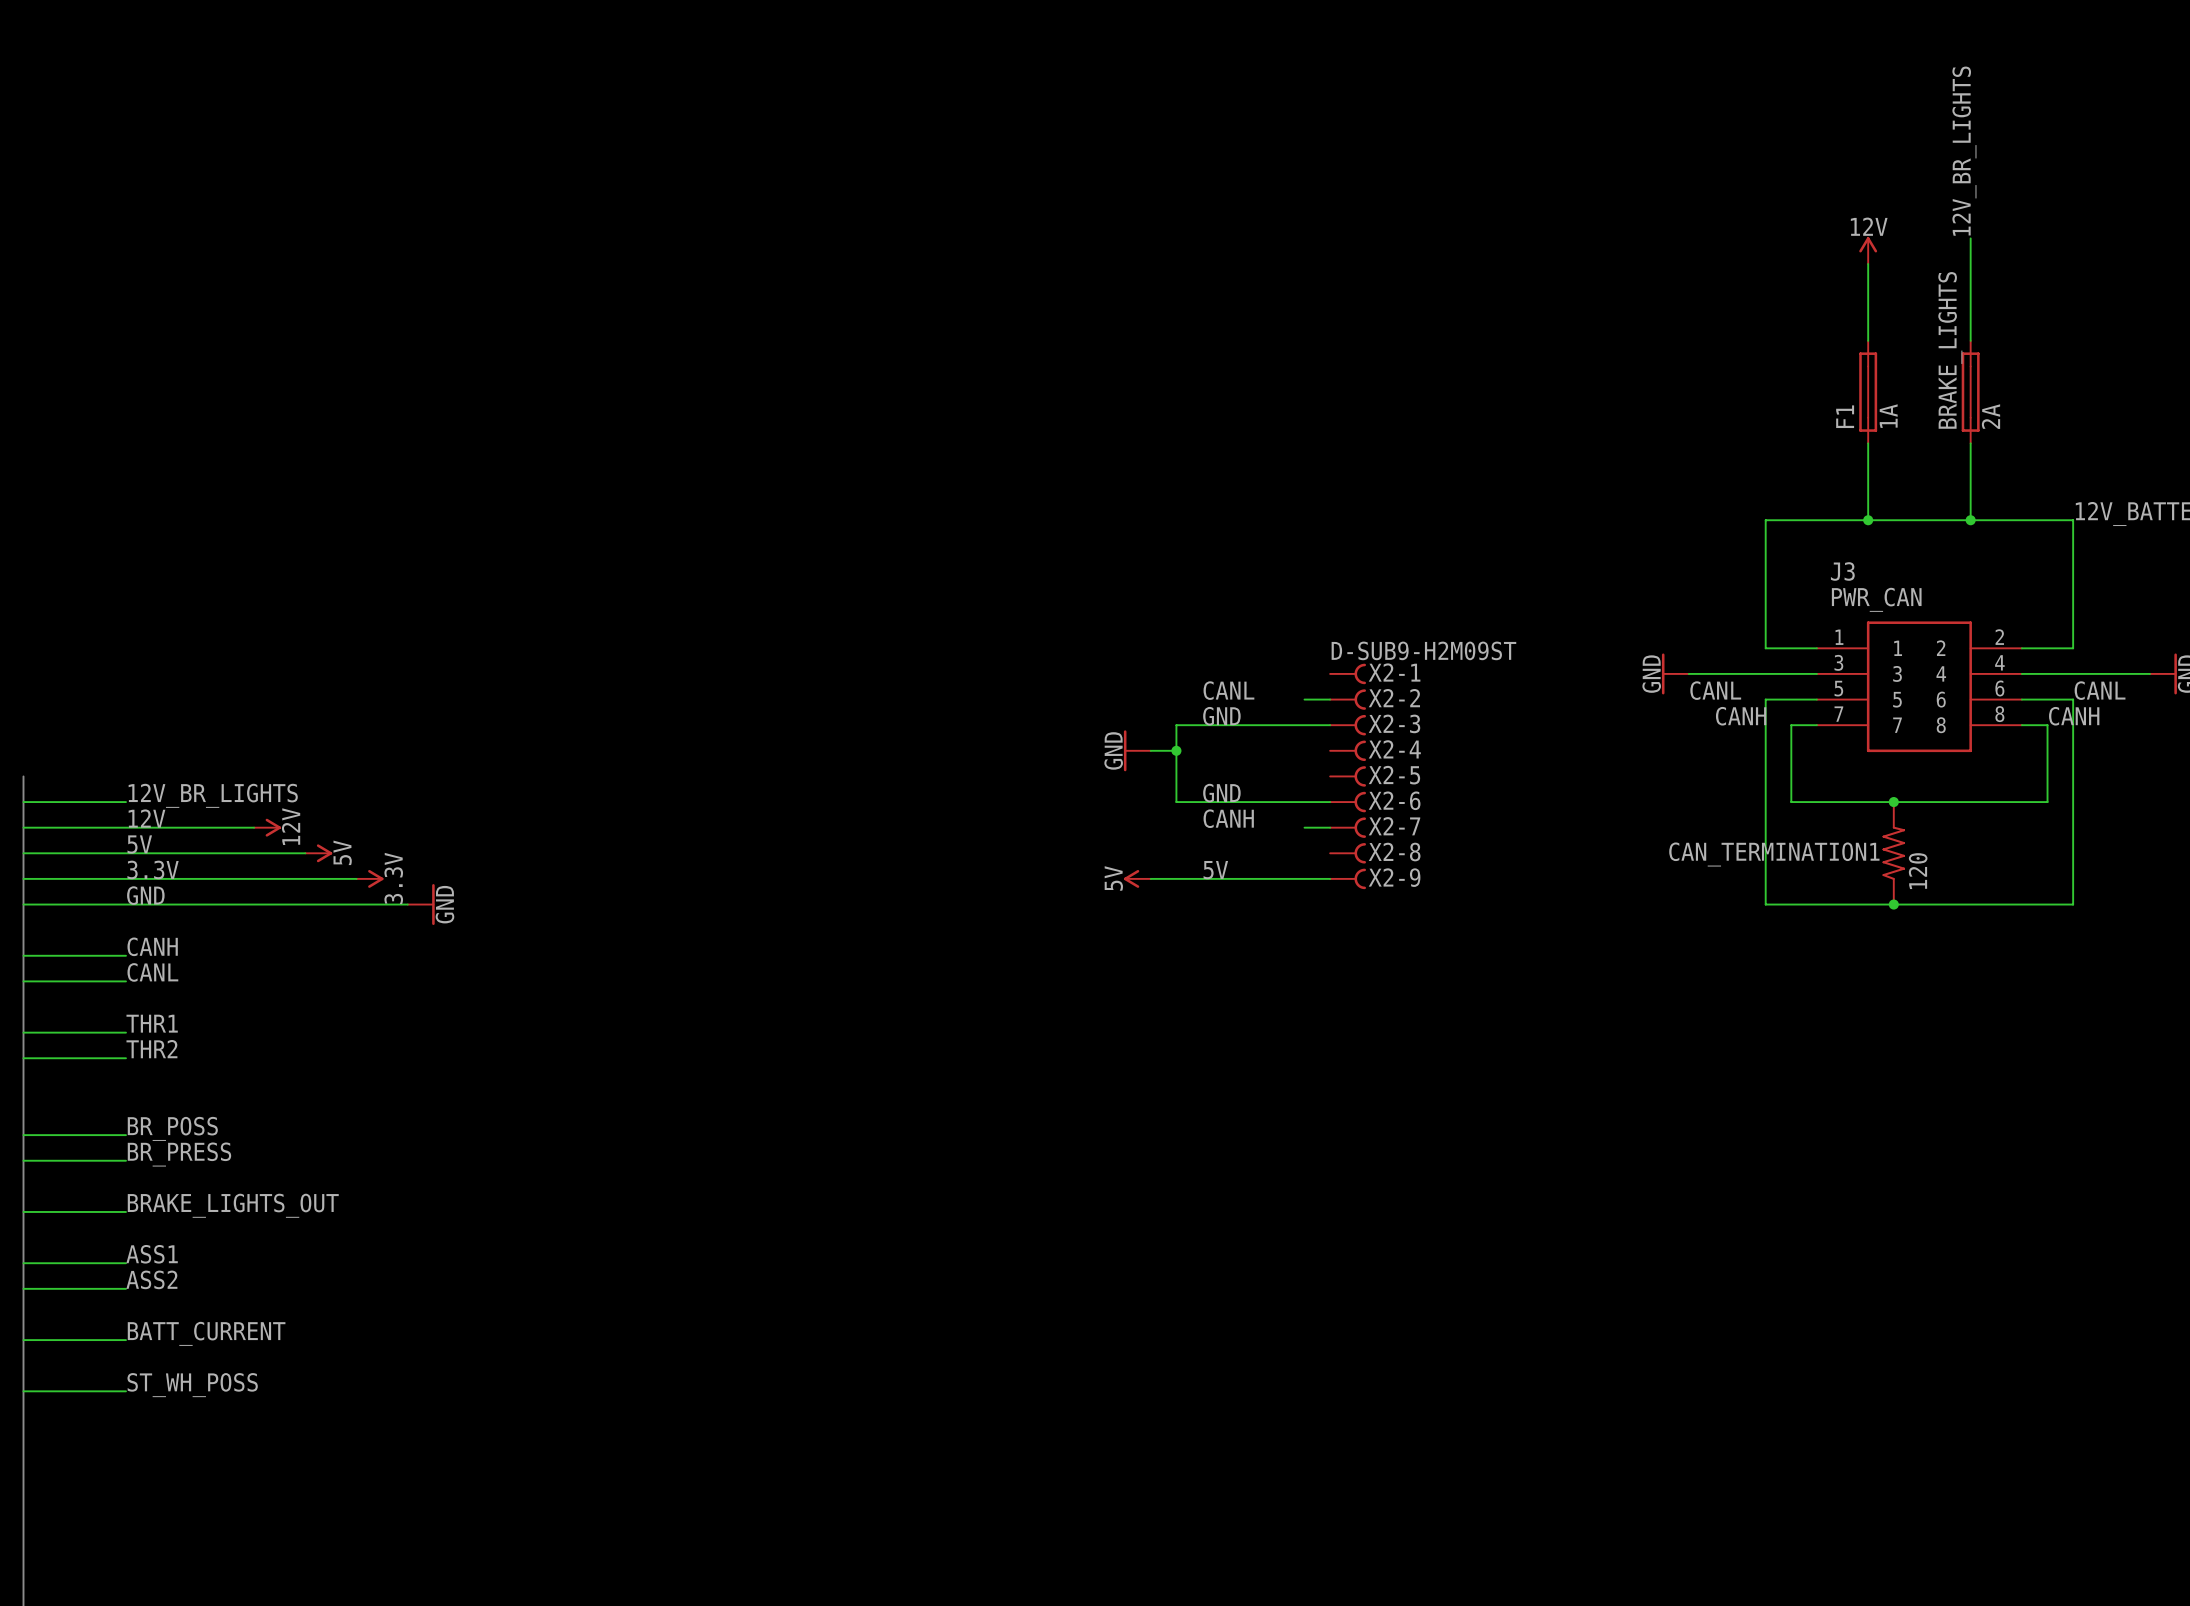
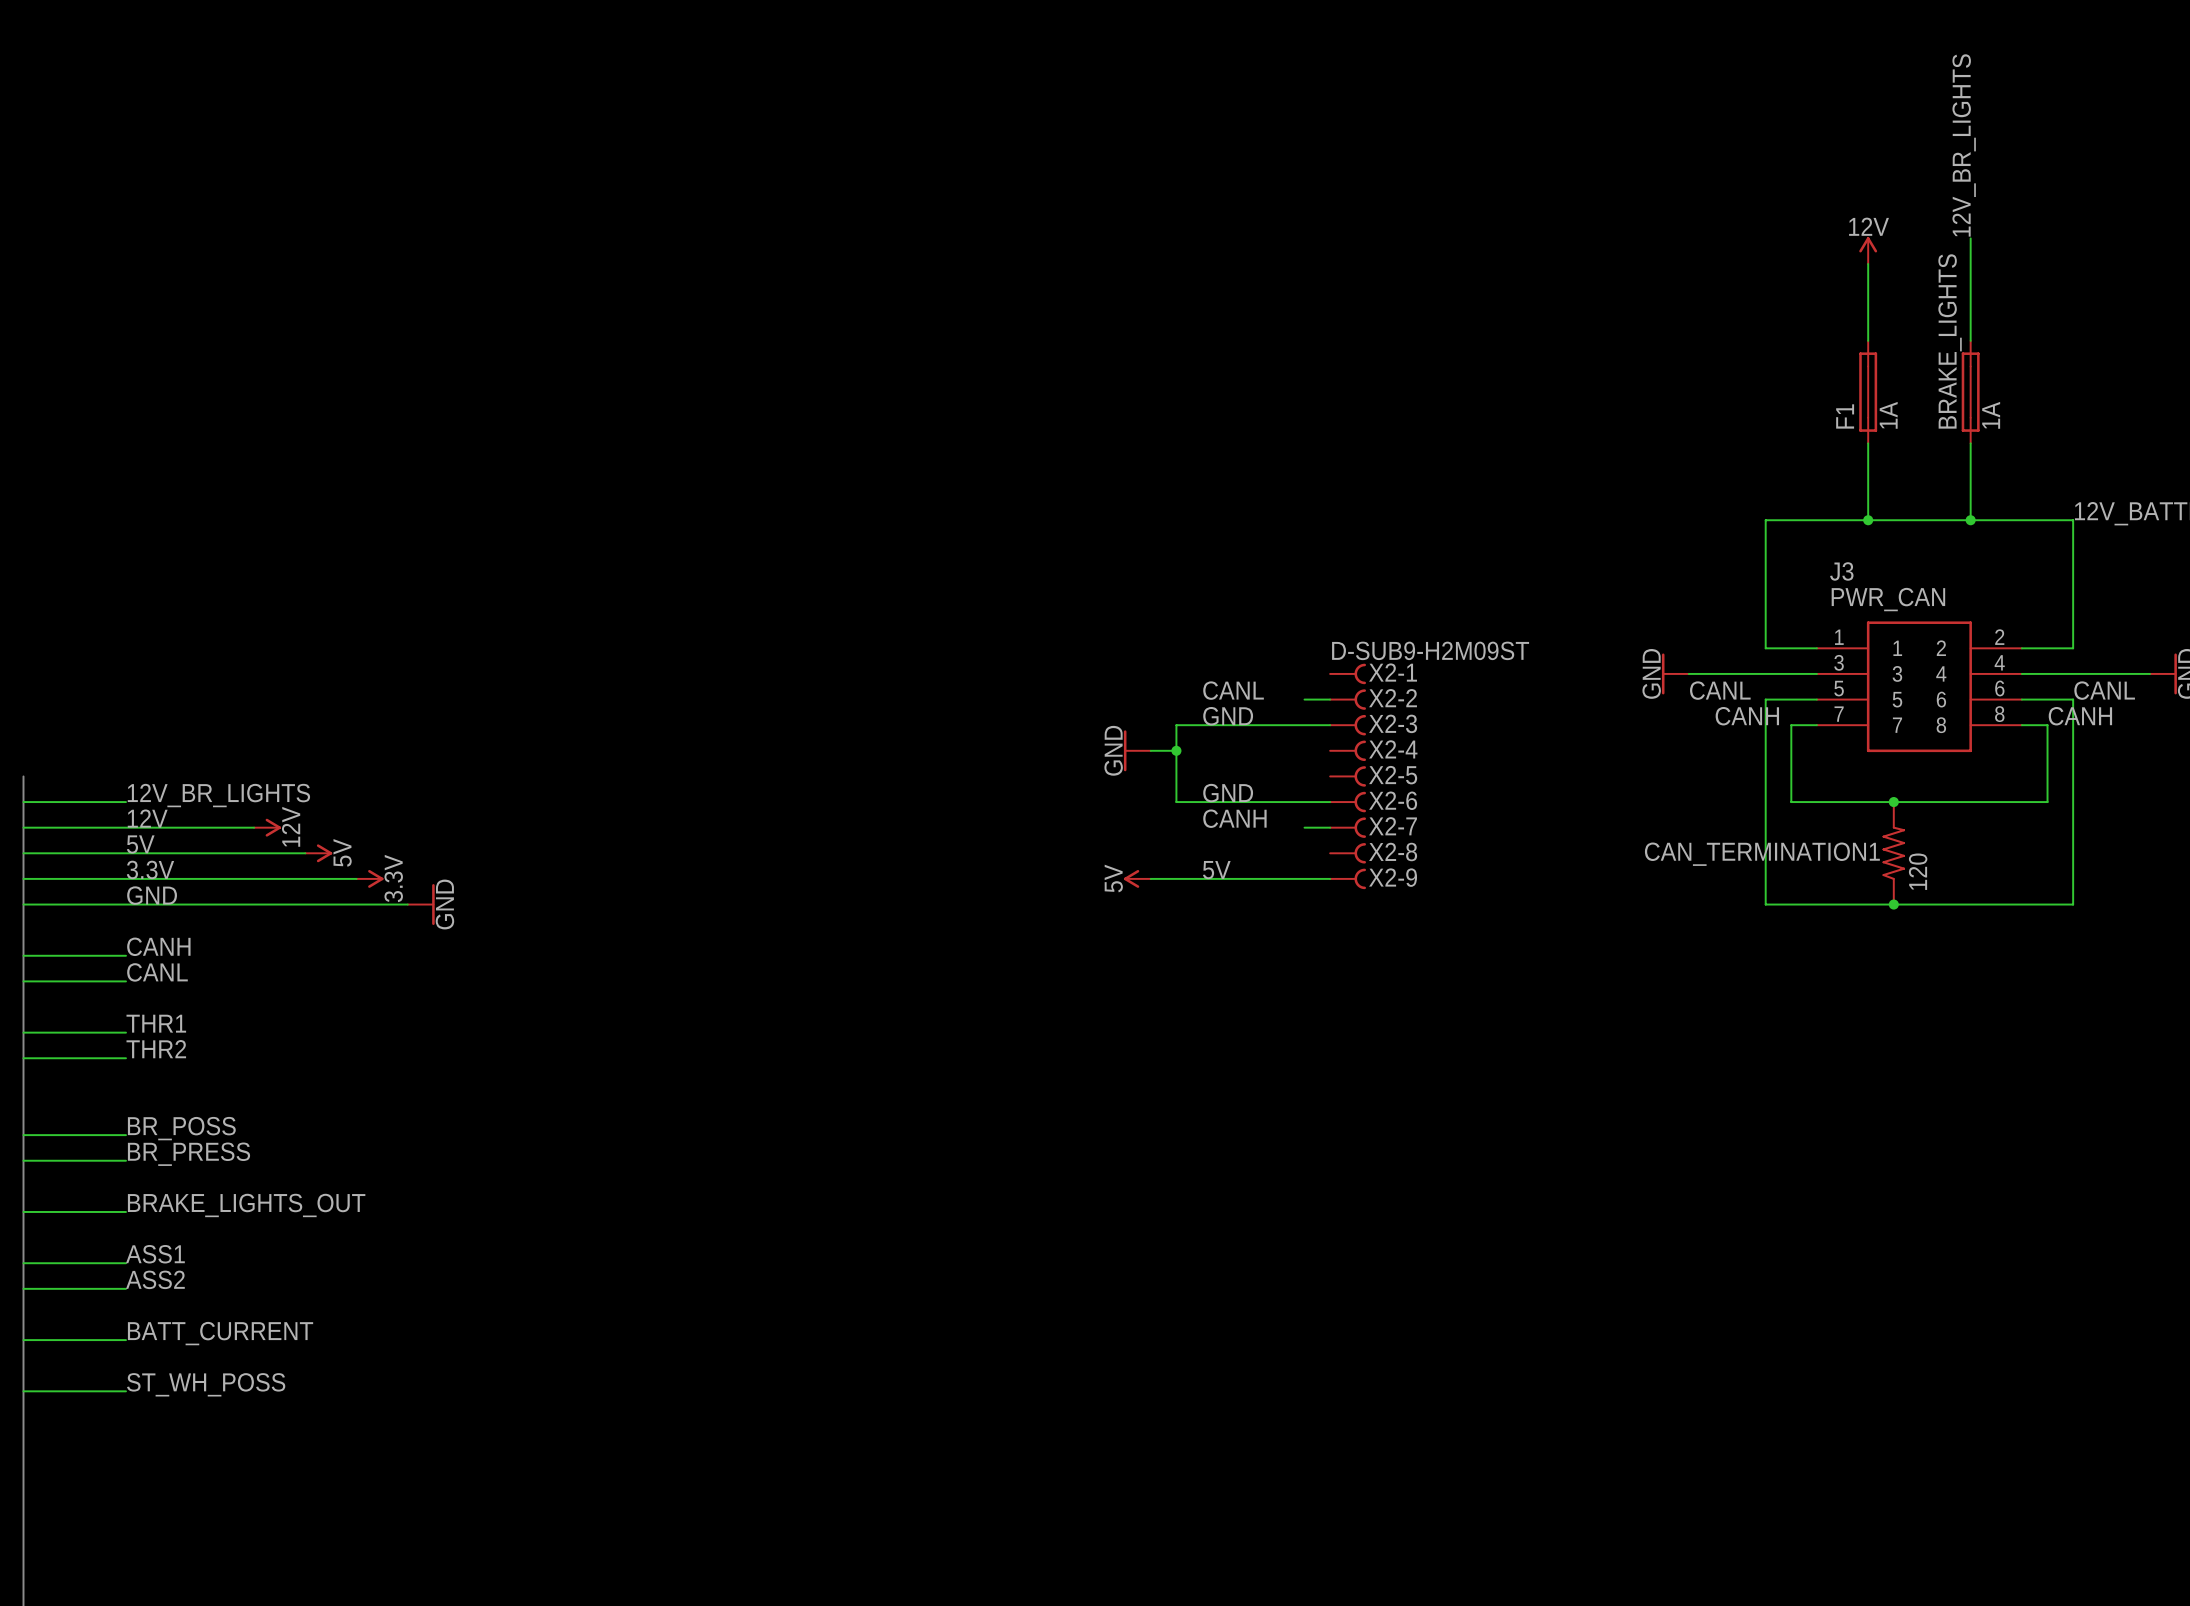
BRAKE_LIGHTS value: 2A (1991, 416) -> 1A (1991, 415)

